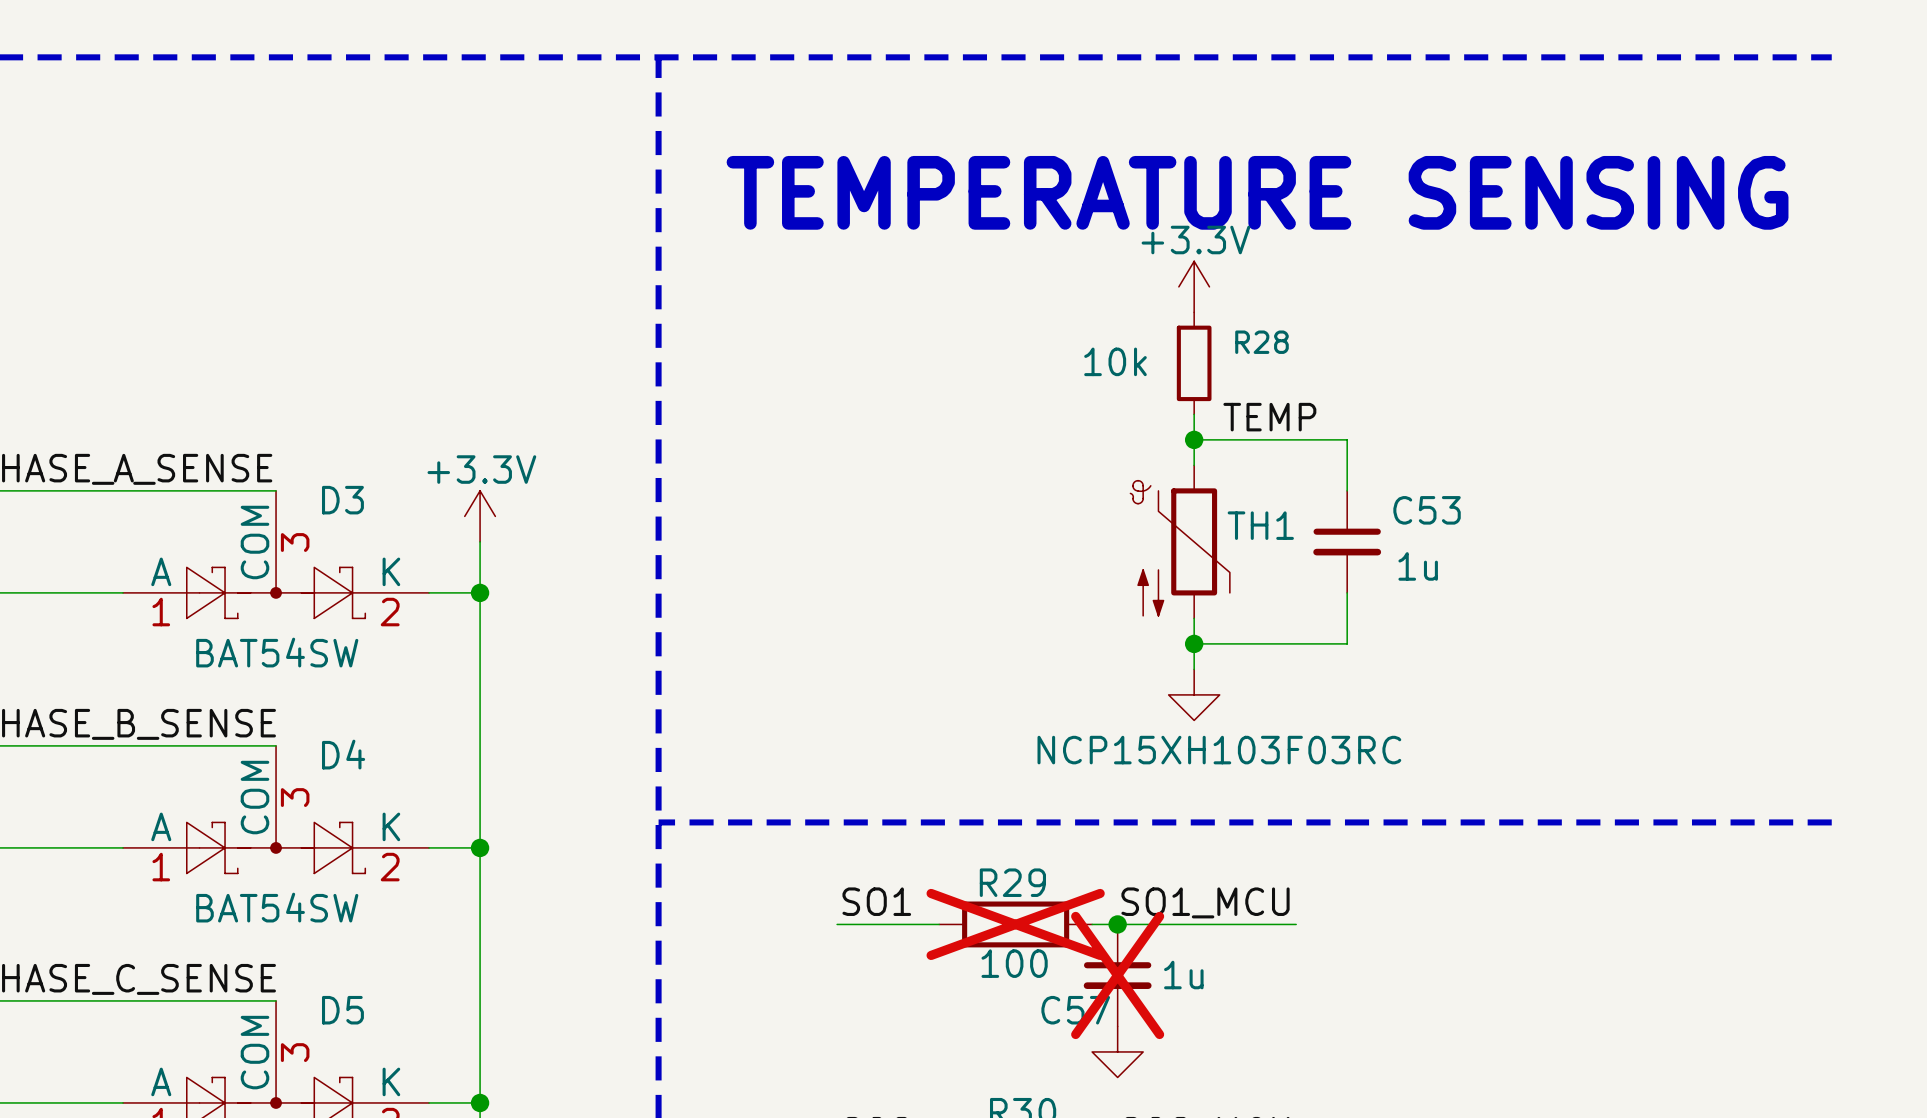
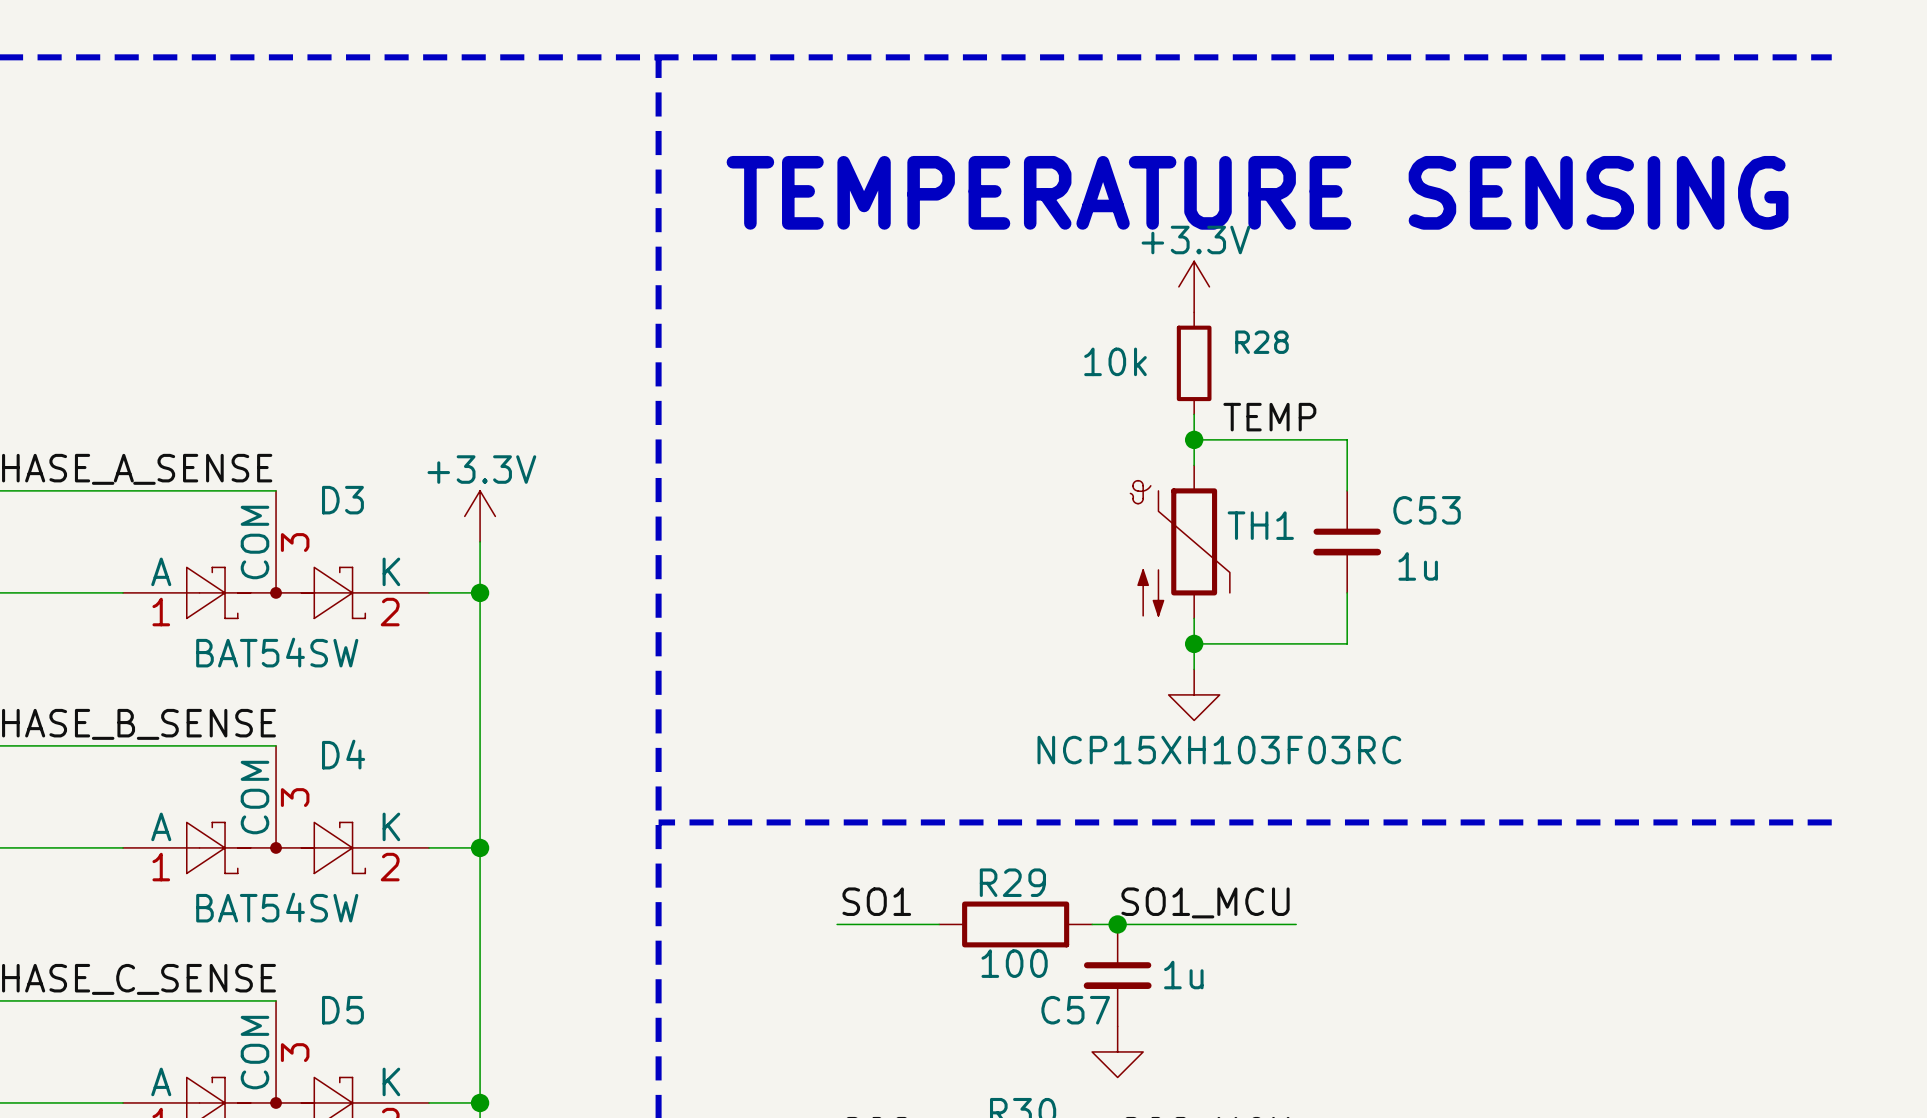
R29 do-not-place cross: (1015, 924) -> none
C57 do-not-place cross: (1117, 975) -> none

